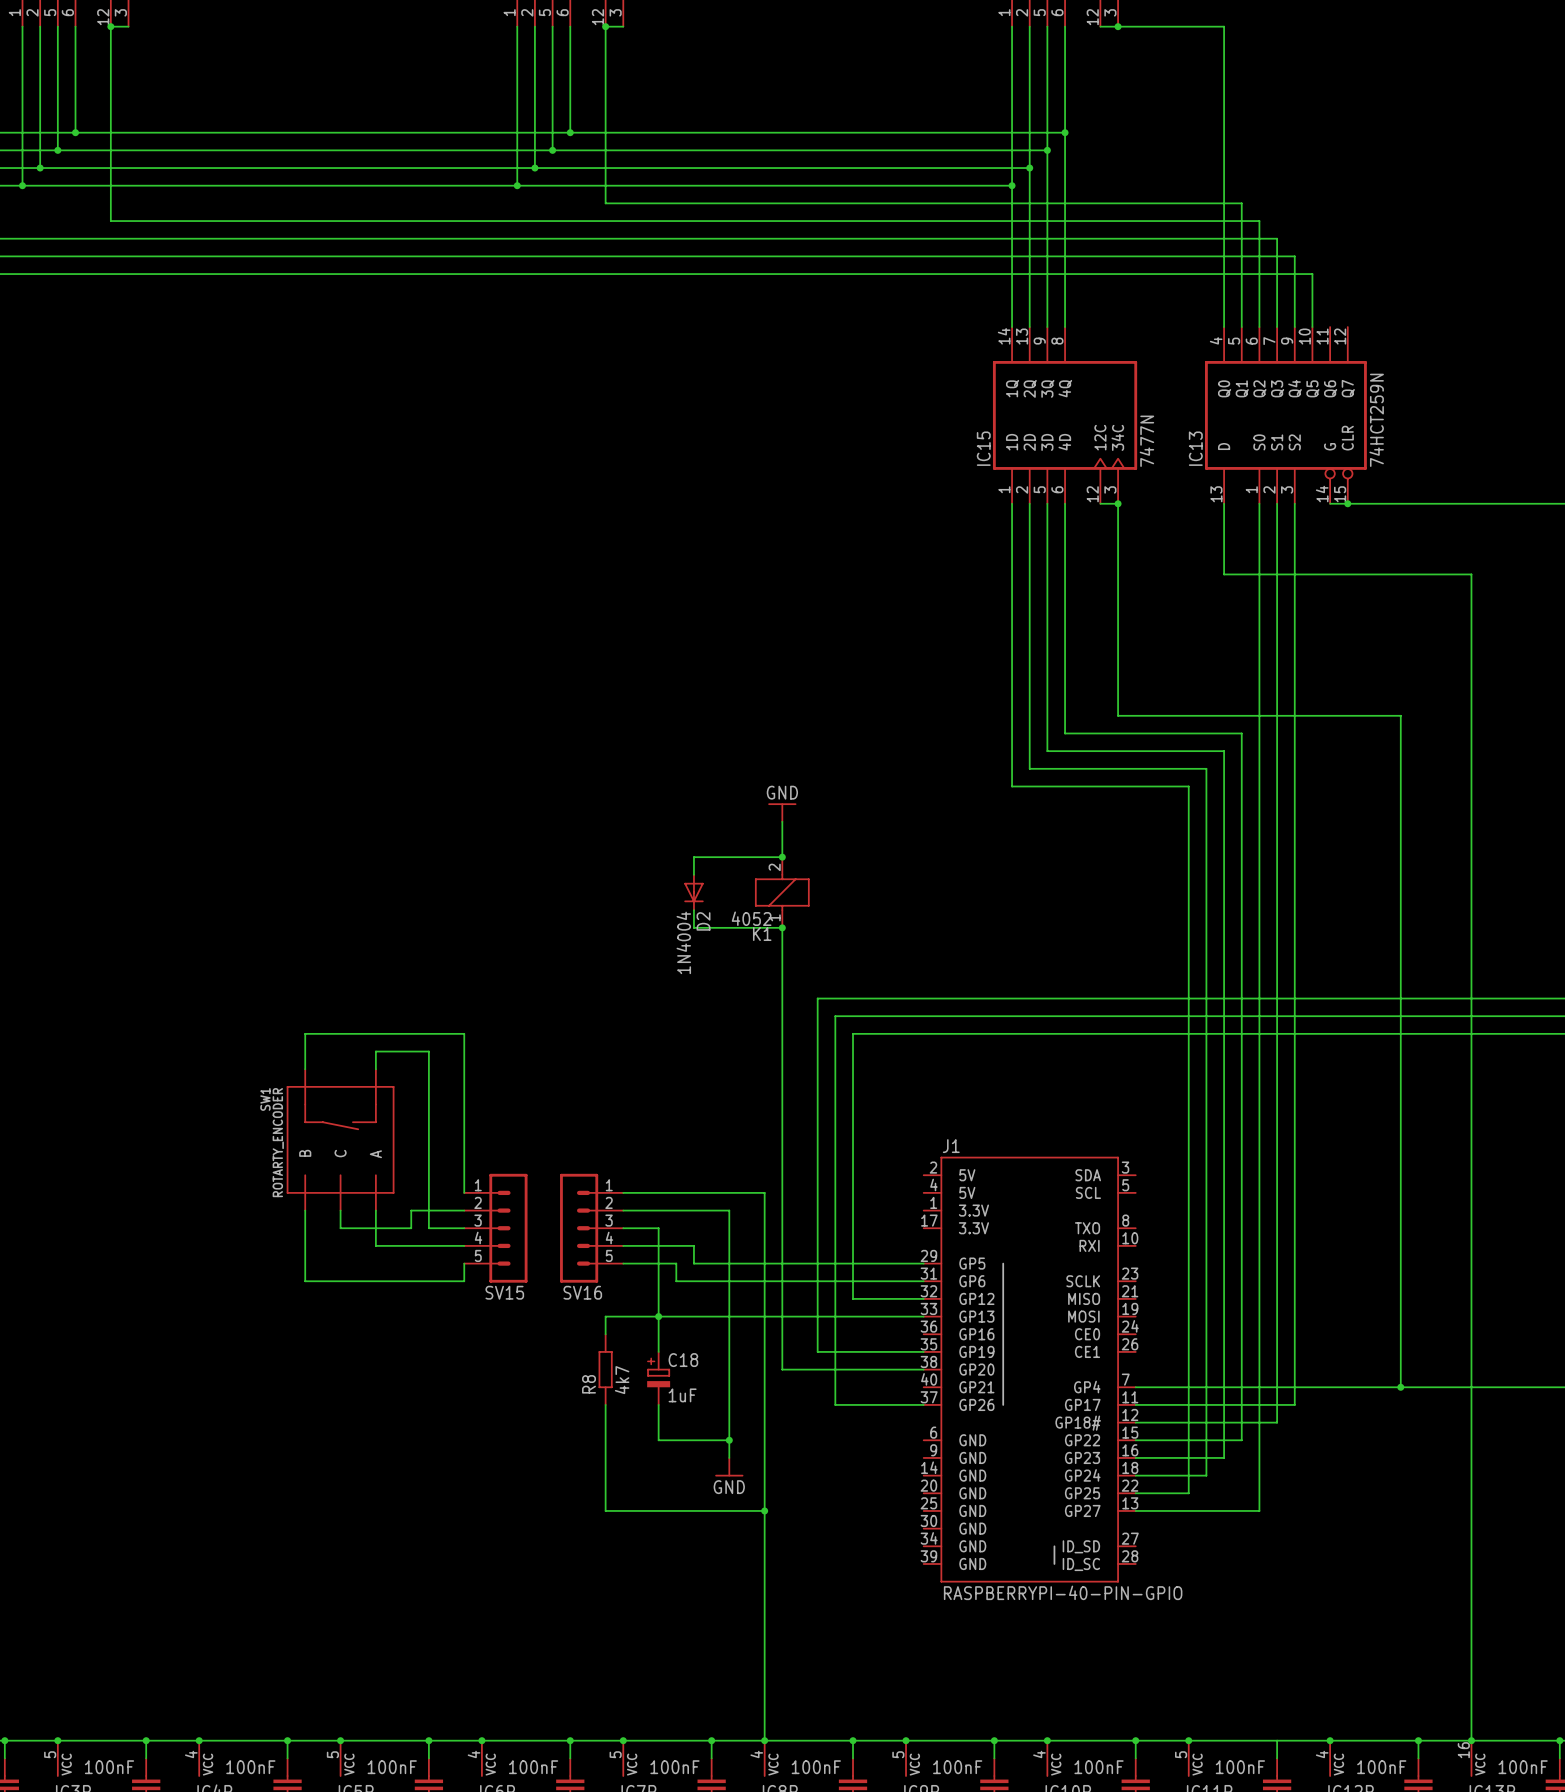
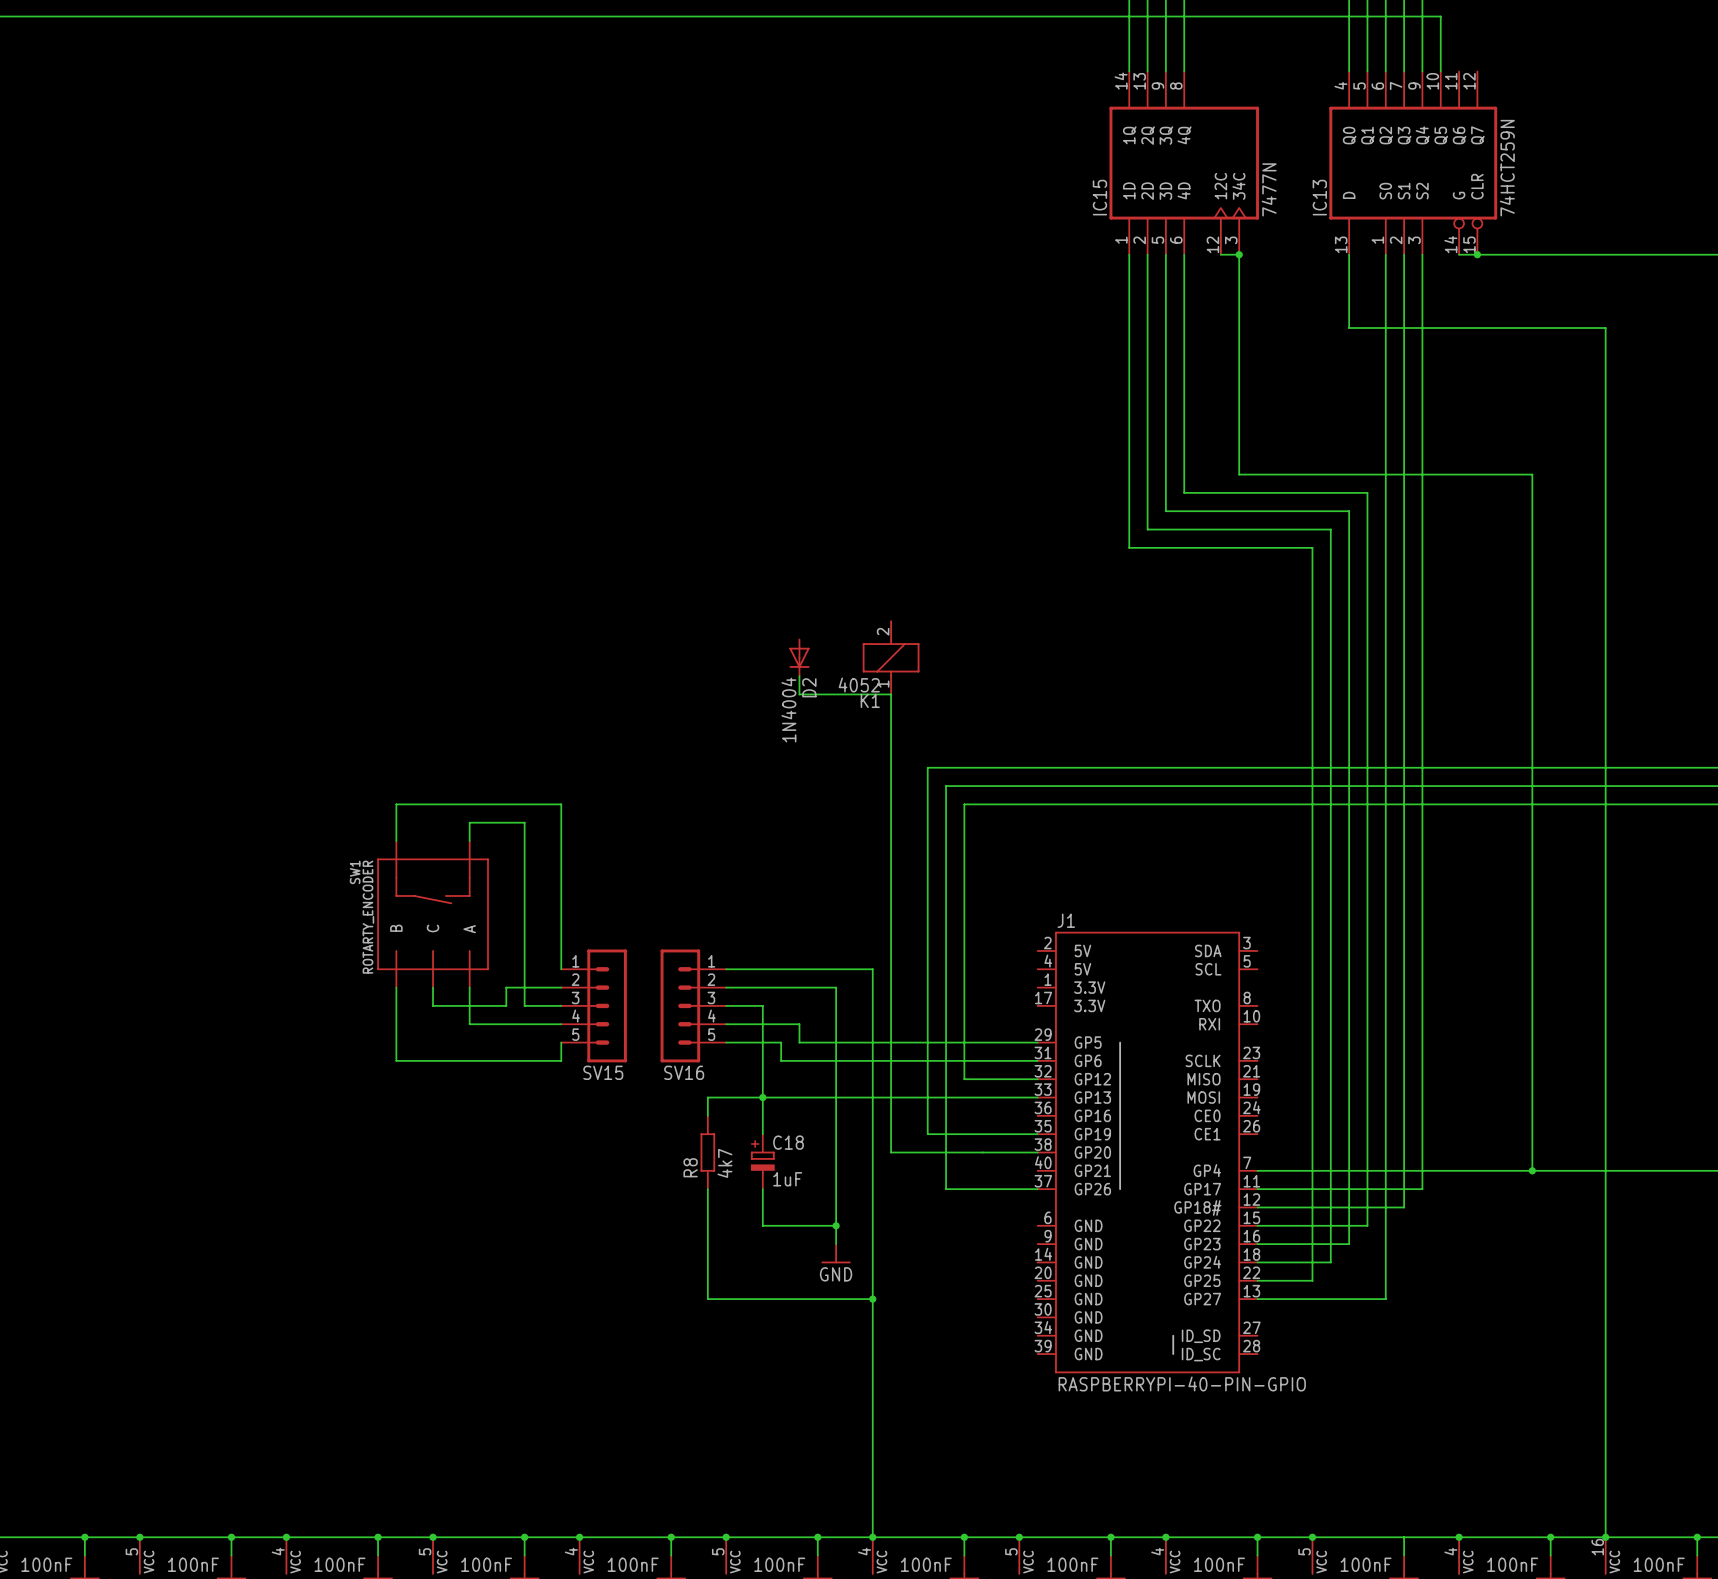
power symbol: GND (782, 812) -> none
wire: (782, 821) (782, 857) (693, 857) (693, 874) -> none
junction: (782, 857) -> none
junction: (782, 927) -> none

